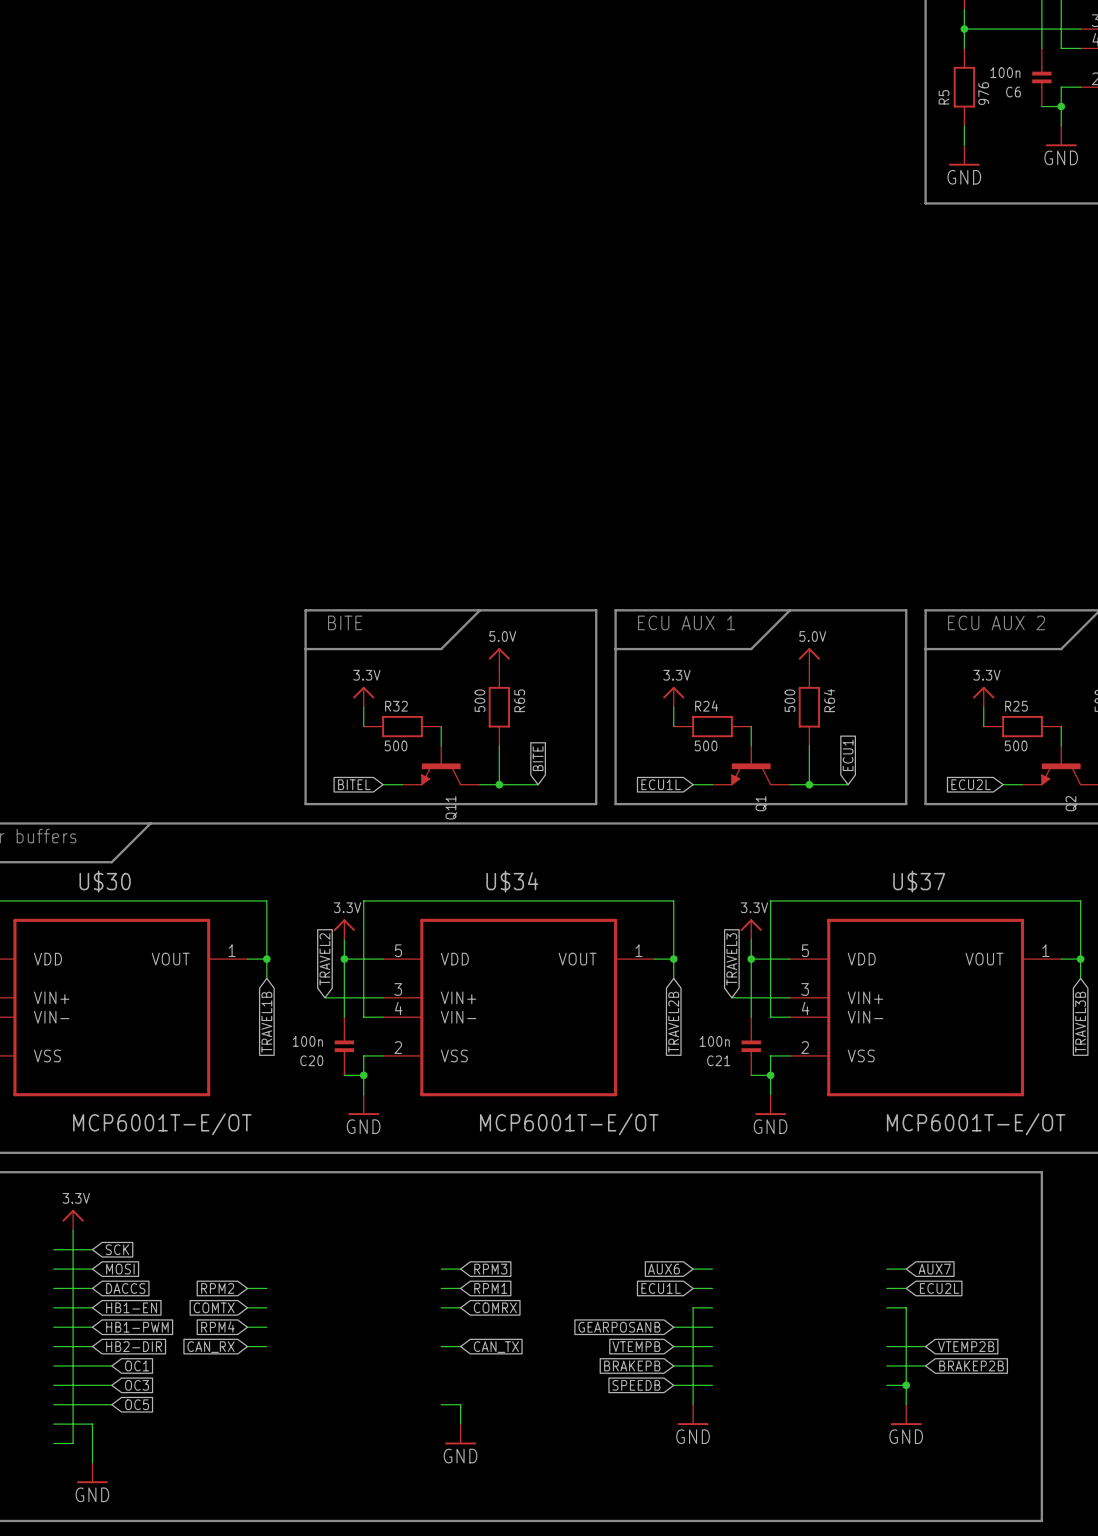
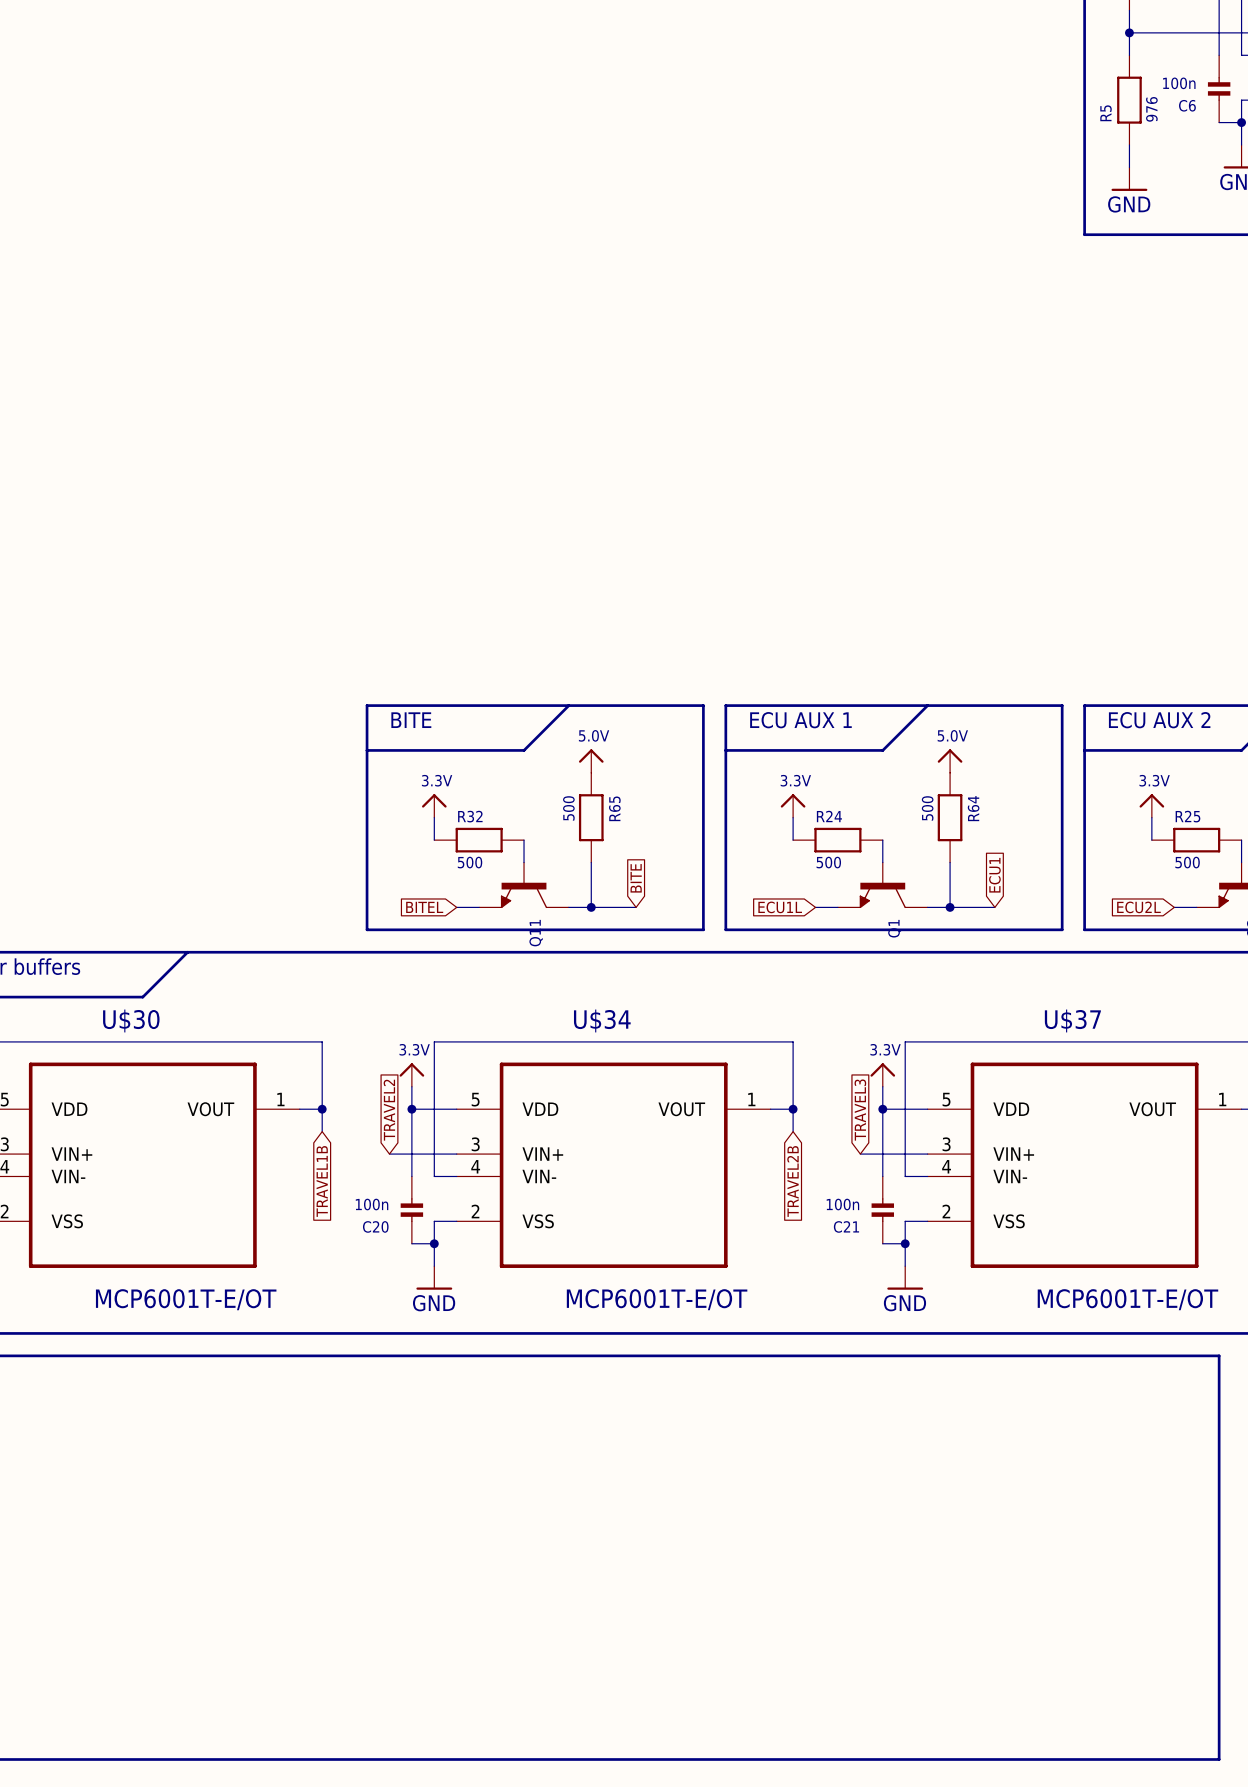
power symbol: 3.3V (73, 1220) -> none
wire: (73, 1230) (73, 1443) (53, 1443) -> none
wire: (53, 1249) (92, 1249) -> none
global label: SCK (117, 1249) -> none
wire: (53, 1269) (92, 1269) -> none
global label: MOSI (120, 1269) -> none
wire: (441, 1269) (460, 1269) -> none
global label: RPM3 (490, 1269) -> none
global label: AUX6 (663, 1269) -> none
wire: (693, 1269) (712, 1269) -> none
wire: (886, 1269) (906, 1269) -> none
global label: AUX7 (934, 1269) -> none
wire: (53, 1288) (92, 1288) -> none
global label: DACCS (125, 1288) -> none
global label: RPM2 (217, 1288) -> none
wire: (247, 1288) (266, 1288) -> none
wire: (441, 1288) (460, 1288) -> none
global label: RPM1 (490, 1288) -> none
global label: ECU1L (661, 1288) -> none
wire: (693, 1288) (712, 1288) -> none
wire: (886, 1288) (906, 1288) -> none
global label: ECU2L (939, 1288) -> none
wire: (53, 1307) (92, 1307) -> none
global label: HB1-EN (131, 1307) -> none
global label: COMTX (214, 1307) -> none
wire: (247, 1307) (266, 1307) -> none
wire: (441, 1307) (460, 1307) -> none
global label: COMRX (495, 1307) -> none
wire: (712, 1307) (693, 1307) (693, 1404) -> none
wire: (886, 1307) (906, 1307) (906, 1404) -> none
global label: RPM4 (217, 1326) -> none
wire: (53, 1327) (92, 1327) -> none
global label: HB1-PWM (137, 1327) -> none
wire: (247, 1327) (266, 1327) -> none
global label: GEARPOSANB (619, 1327) -> none
wire: (673, 1327) (712, 1327) -> none
wire: (53, 1346) (92, 1346) -> none
global label: HB2-DIR (134, 1346) -> none
wire: (247, 1346) (266, 1346) -> none
wire: (441, 1346) (460, 1346) -> none
global label: VTEMPB (636, 1346) -> none
wire: (673, 1346) (712, 1346) -> none
wire: (886, 1346) (925, 1346) -> none
global label: VTEMP2B (966, 1346) -> none
global label: CAN_RX (211, 1347) -> none
global label: CAN_TX (496, 1347) -> none
wire: (53, 1365) (111, 1365) -> none
global label: OC1 (137, 1365) -> none
global label: BRAKEPB (632, 1365) -> none
wire: (673, 1365) (712, 1365) -> none
wire: (886, 1365) (925, 1365) -> none
global label: BRAKEP2B (971, 1365) -> none
wire: (53, 1385) (111, 1385) -> none
global label: OC3 (137, 1385) -> none
global label: SPEEDB (636, 1385) -> none
wire: (673, 1385) (712, 1385) -> none
wire: (886, 1385) (906, 1385) -> none
junction: (906, 1385) -> none
wire: (53, 1404) (111, 1404) -> none
global label: OC5 (137, 1404) -> none
wire: (441, 1404) (460, 1404) (460, 1424) -> none
power symbol: GND (693, 1414) -> none
power symbol: GND (906, 1414) -> none
wire: (53, 1424) (92, 1424) (92, 1462) -> none
power symbol: GND (460, 1434) -> none
power symbol: GND (92, 1473) -> none

